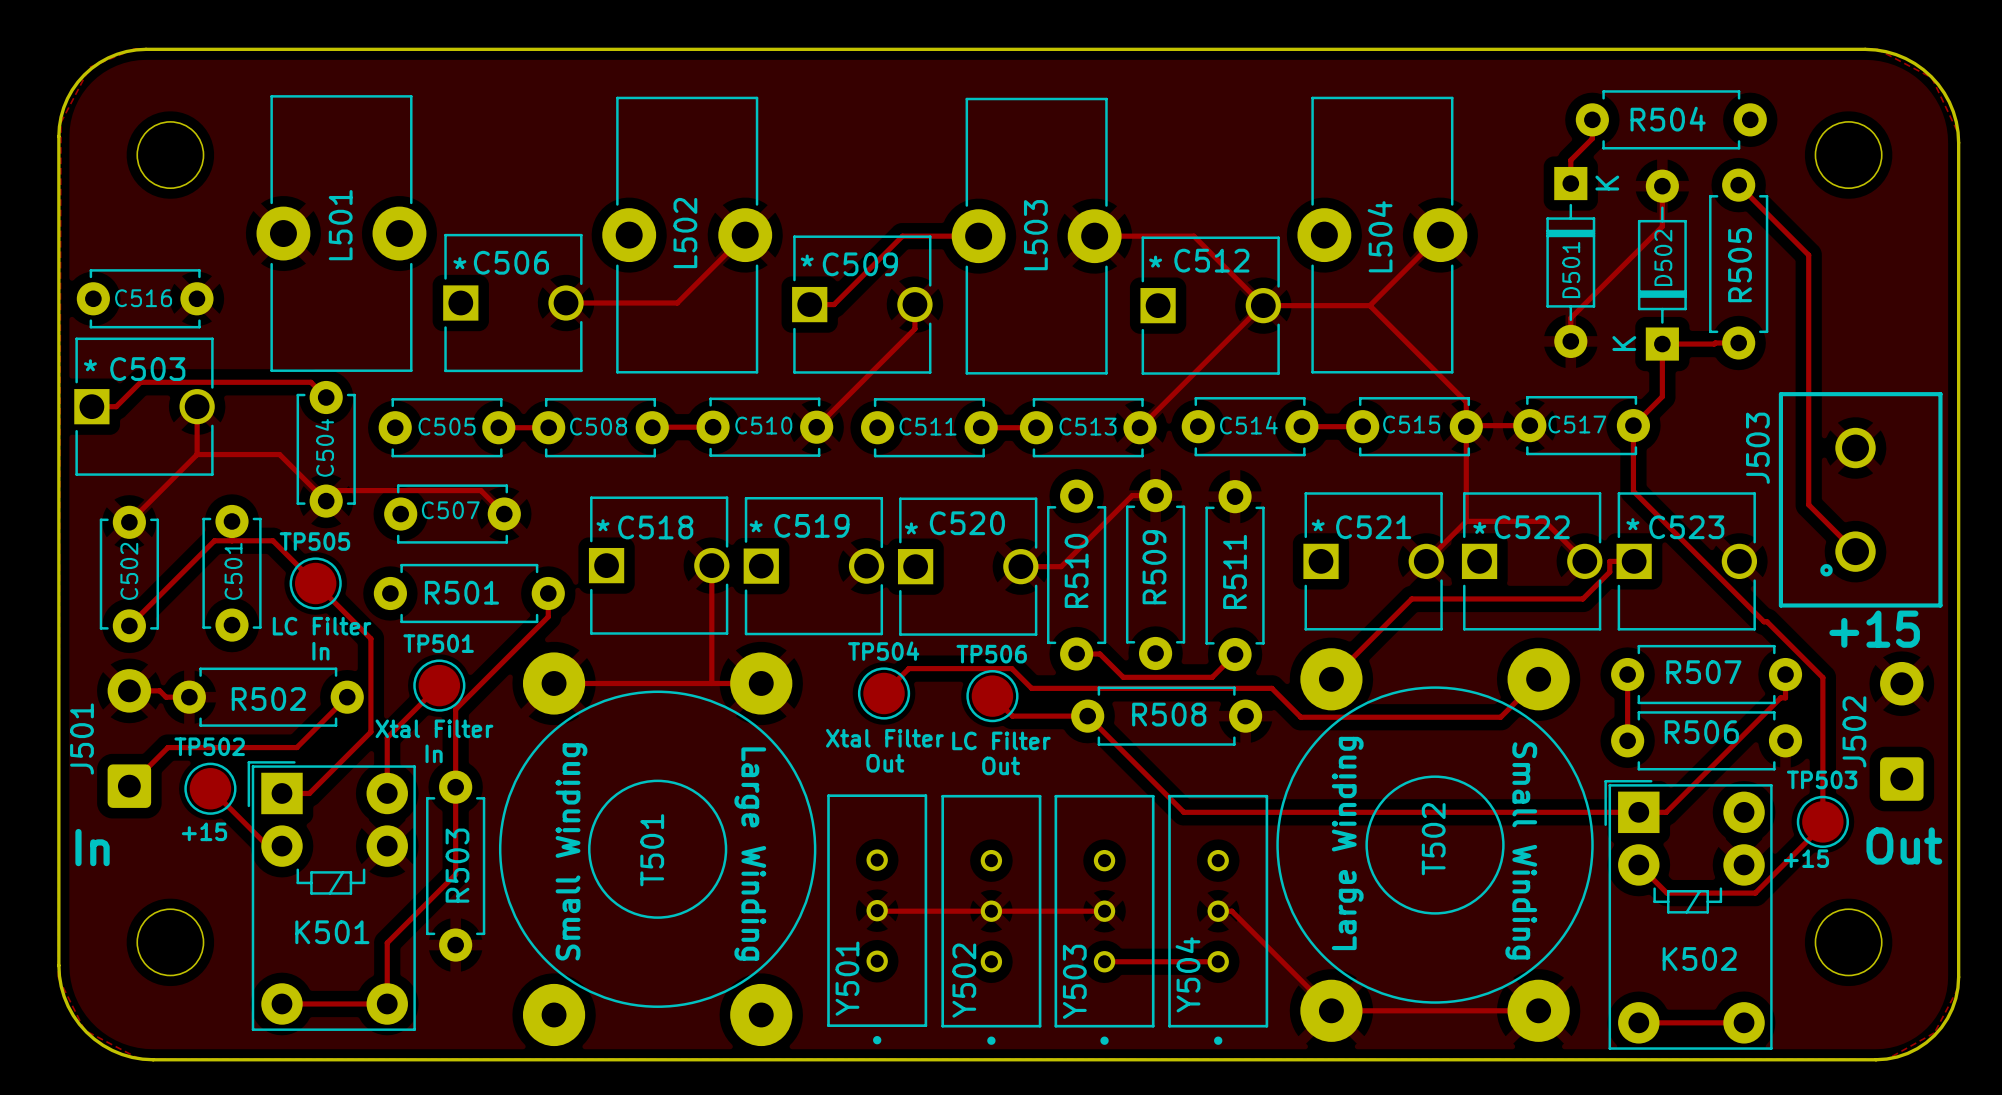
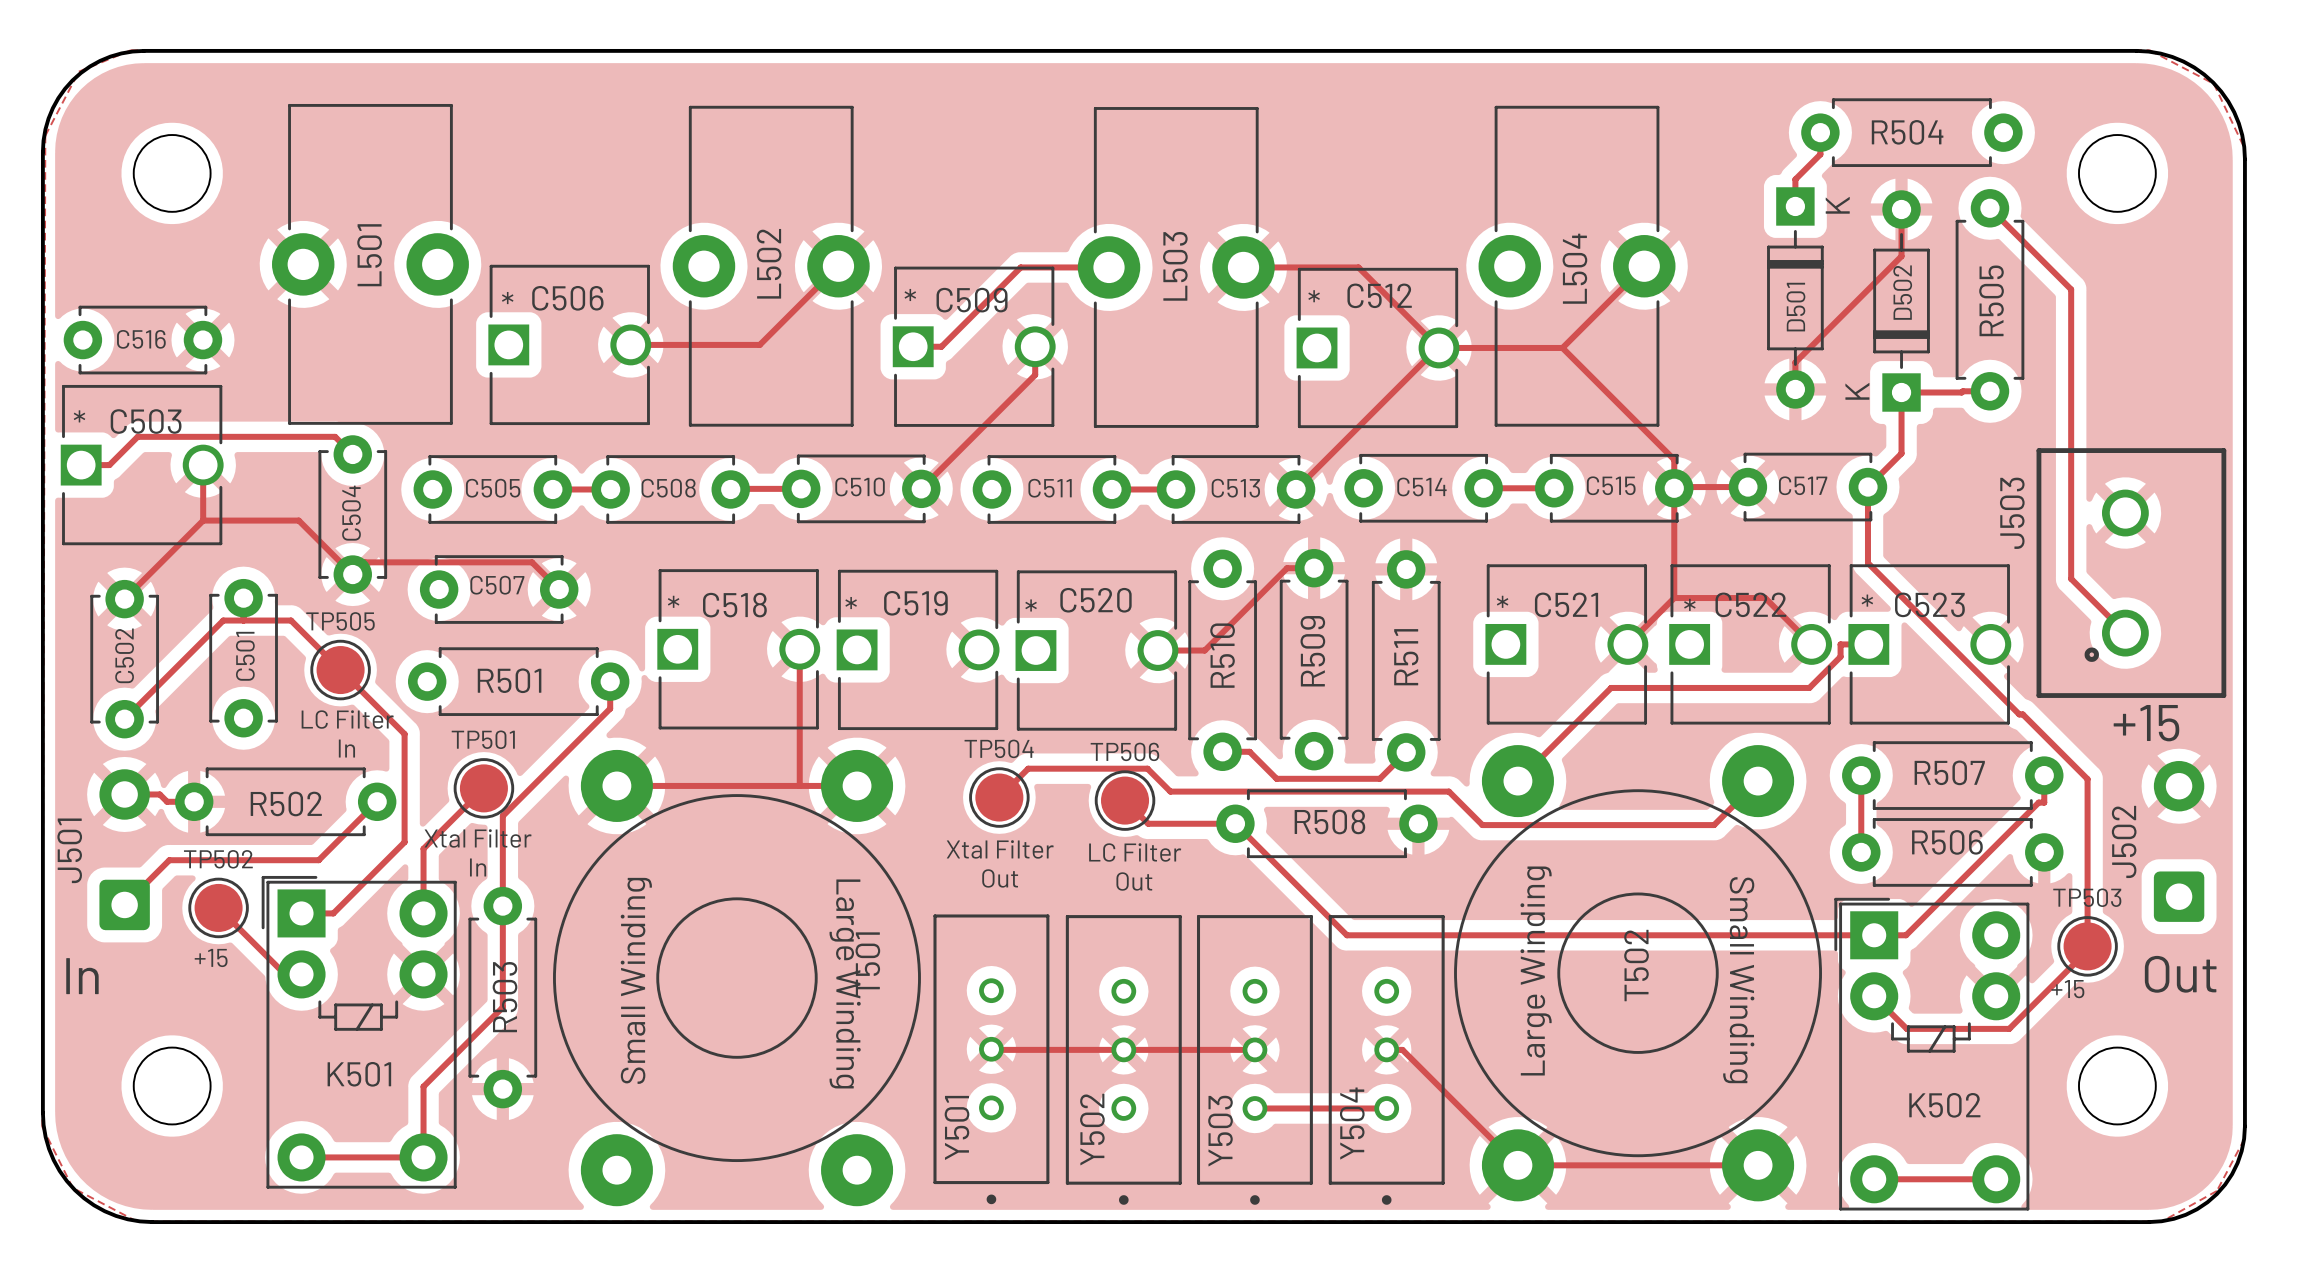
T501 name position: T501 (652, 850) -> T501 (867, 964)

